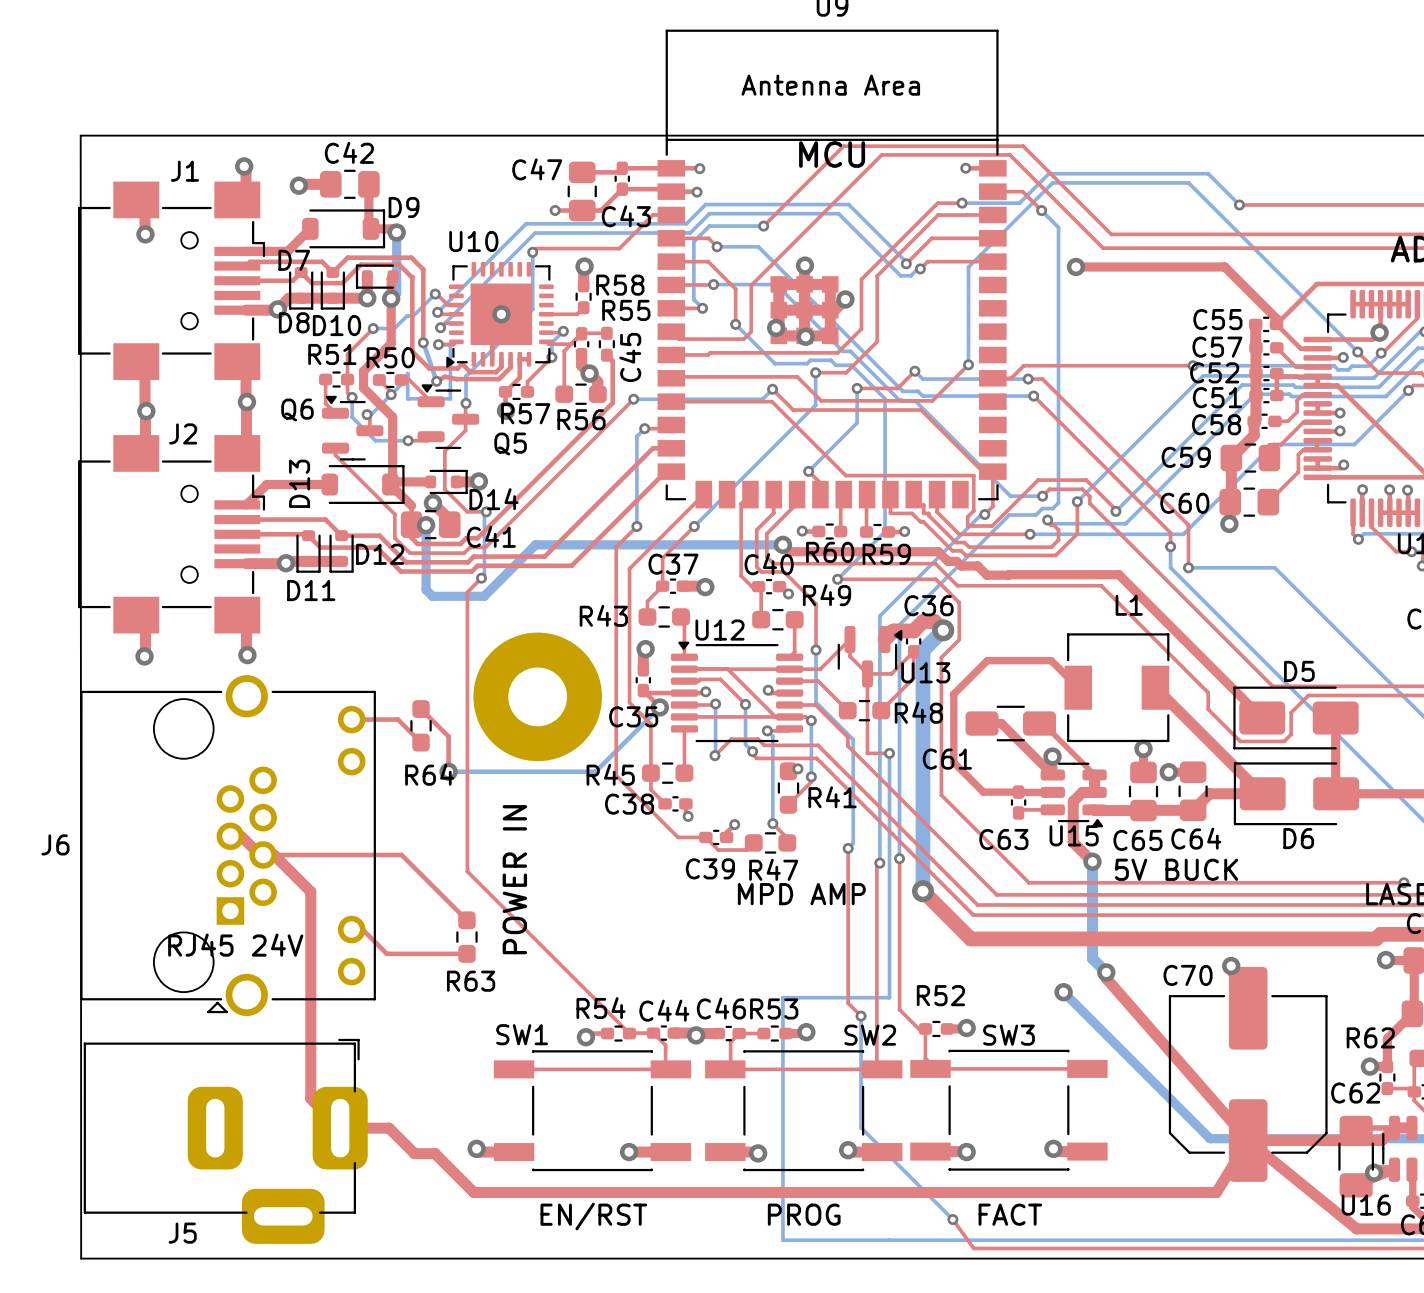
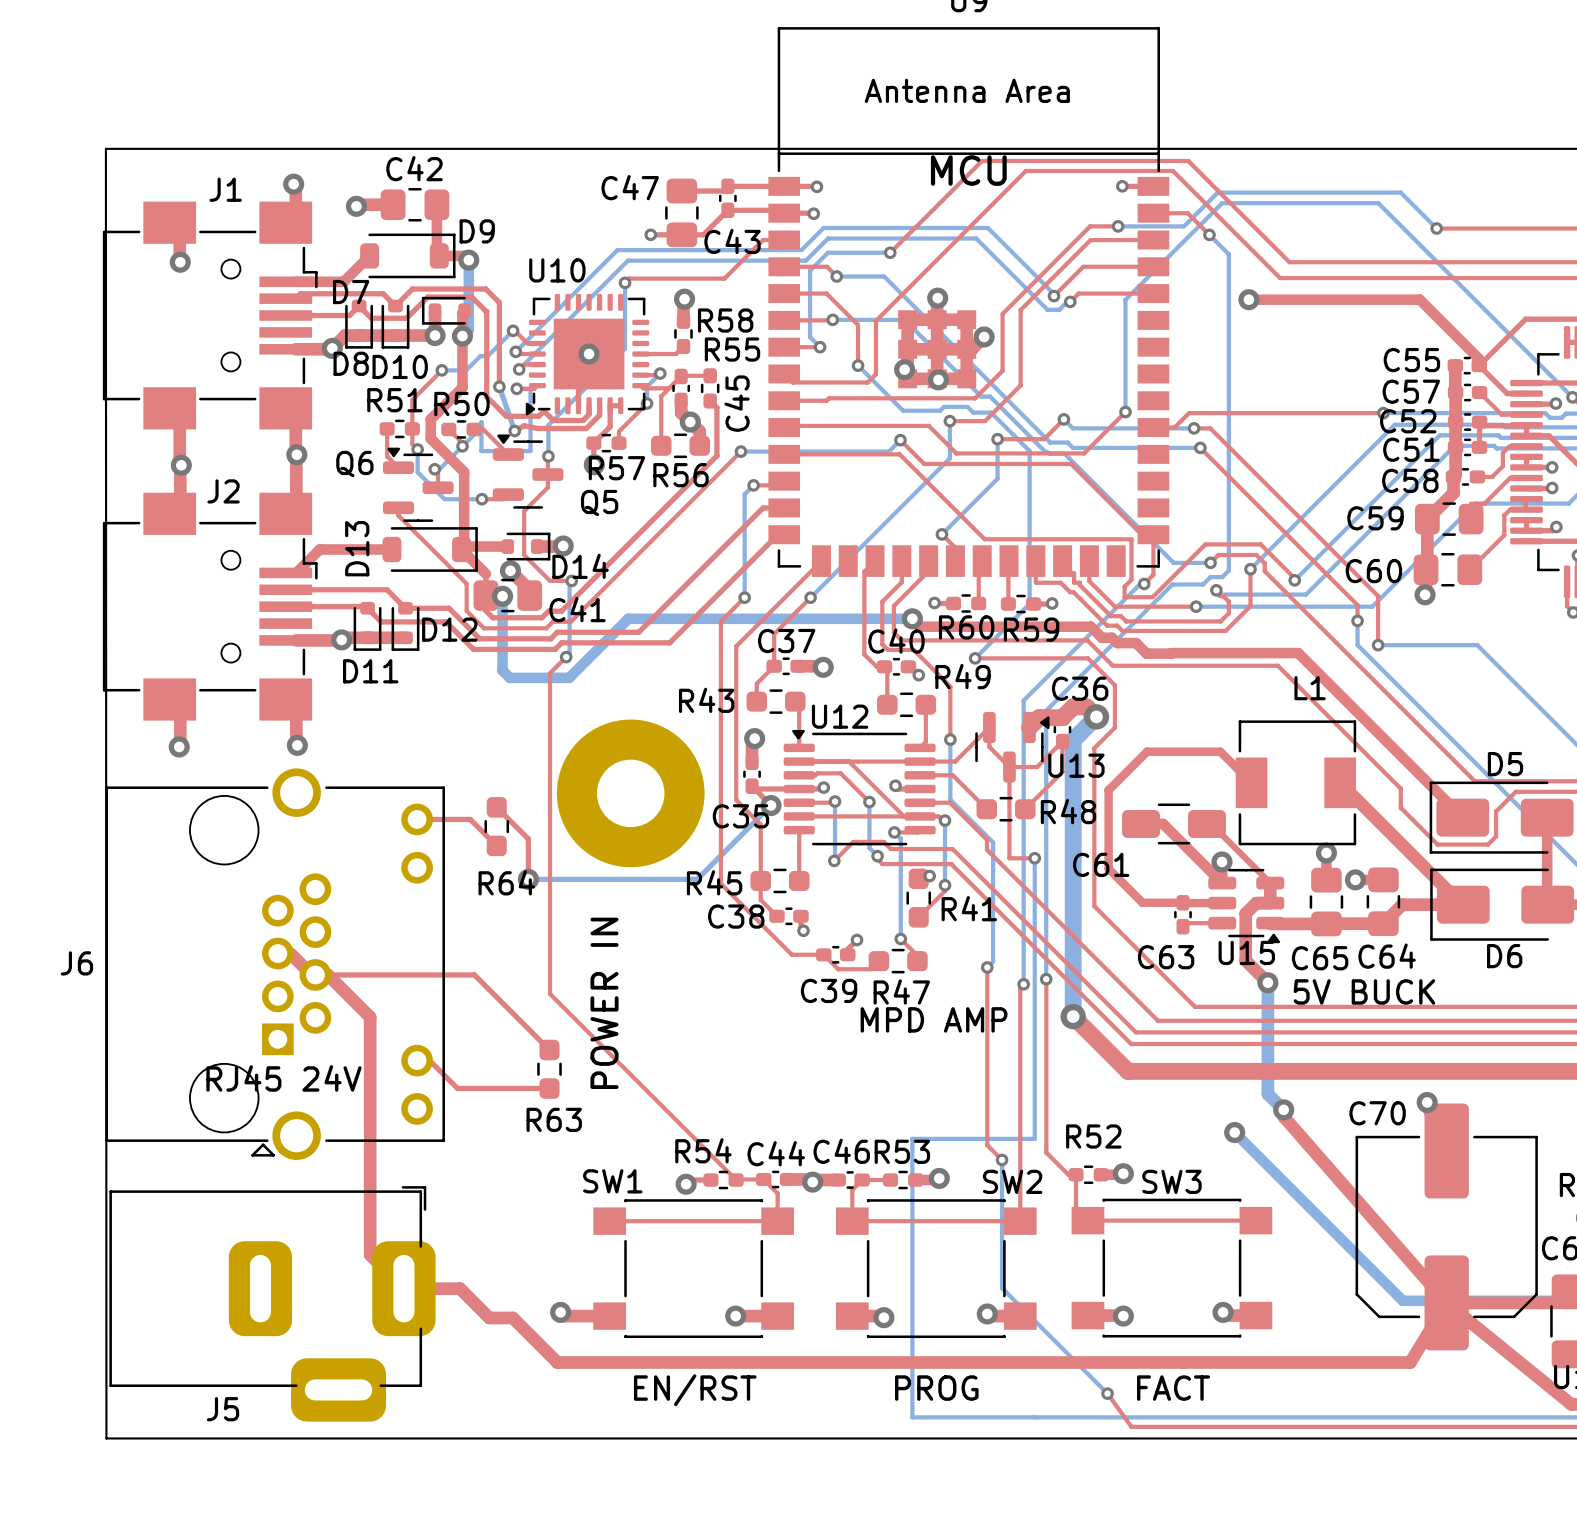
SW3 footprint: [910, 1049, 1108, 1171] -> [1071, 1198, 1273, 1338]
SW1 footprint: [493, 1050, 692, 1172] -> [593, 1199, 794, 1339]
SW2 footprint: [705, 1050, 903, 1172] -> [835, 1199, 1037, 1339]

